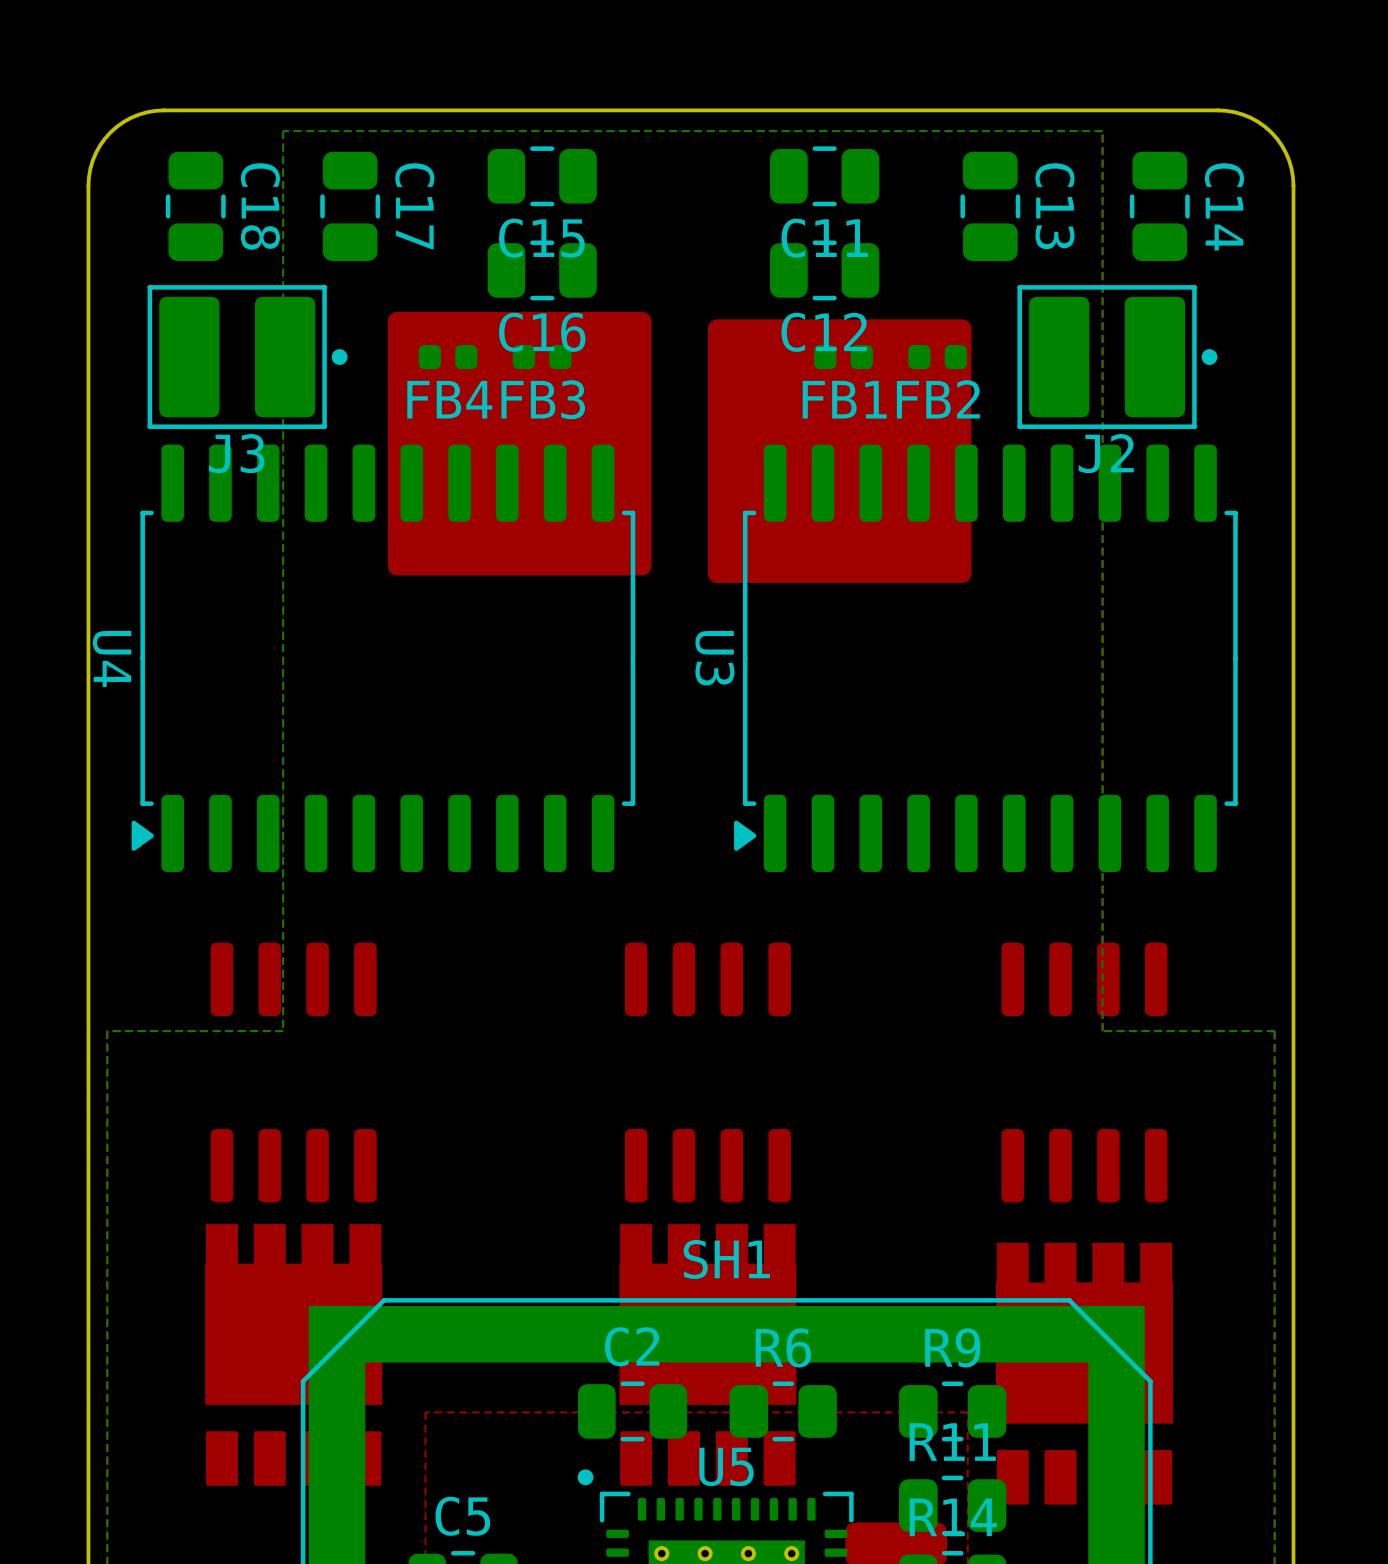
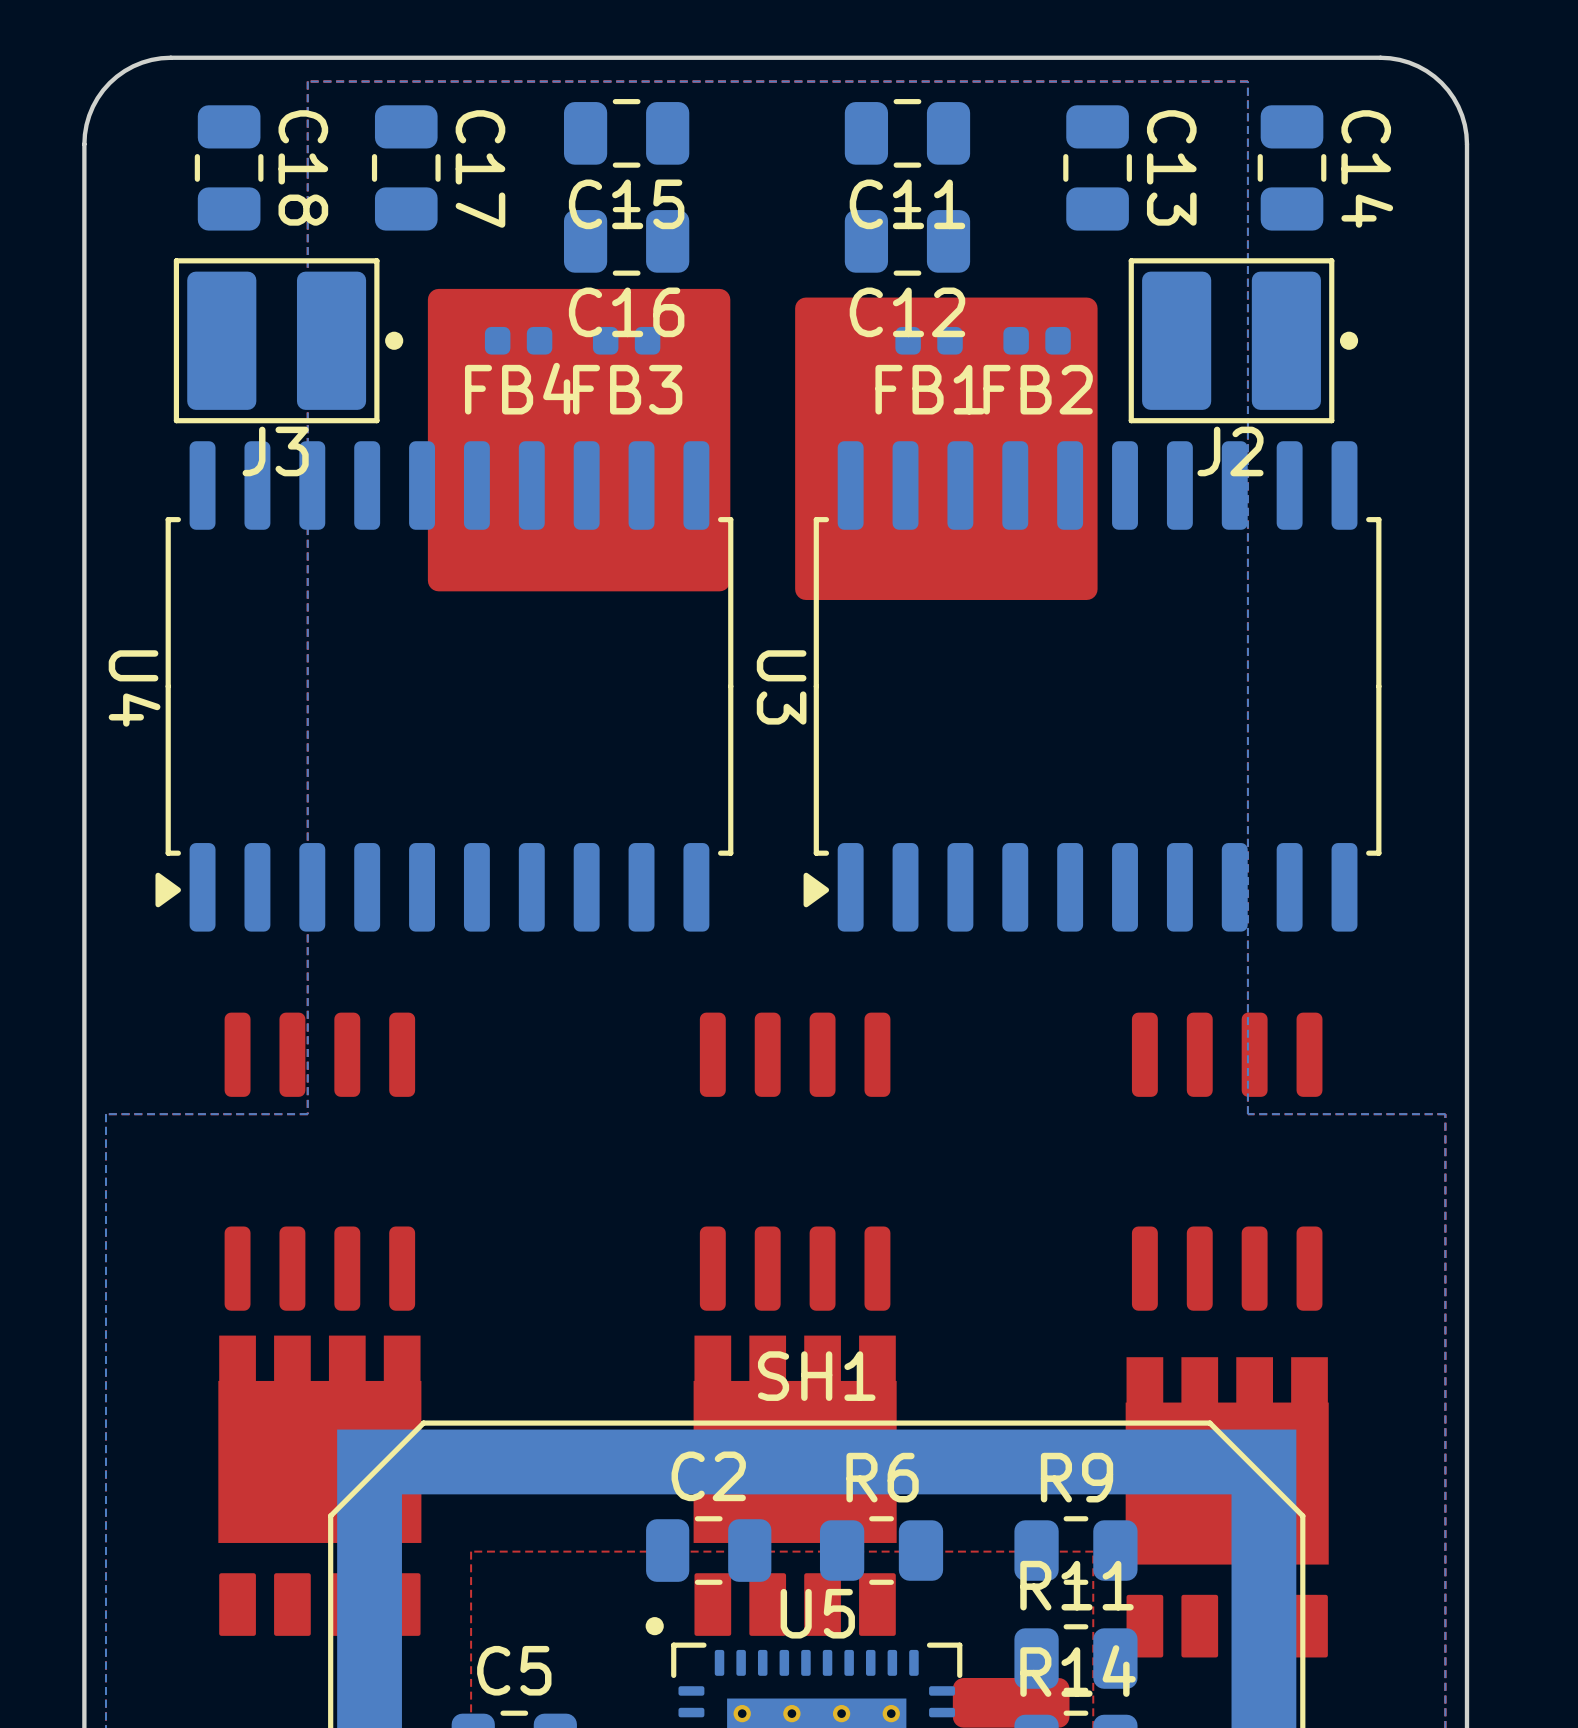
C15 position: (542, 176) -> (626, 133)
C11 position: (824, 176) -> (907, 133)
C18 position: (195, 206) -> (229, 167)
C17 position: (350, 206) -> (406, 167)
C13 position: (990, 206) -> (1097, 167)
C14 position: (1159, 206) -> (1292, 167)
C16 position: (542, 270) -> (626, 241)
C12 position: (824, 270) -> (907, 241)
J3 position: (247, 357) -> (288, 340)
FB4 position: (448, 357) -> (518, 340)
FB3 position: (542, 357) -> (626, 340)
FB1 position: (843, 357) -> (929, 340)
FB2 position: (937, 357) -> (1037, 340)
J2 position: (1117, 357) -> (1243, 340)
U4 position: (383, 658) -> (444, 686)
U3 position: (985, 658) -> (1092, 686)

